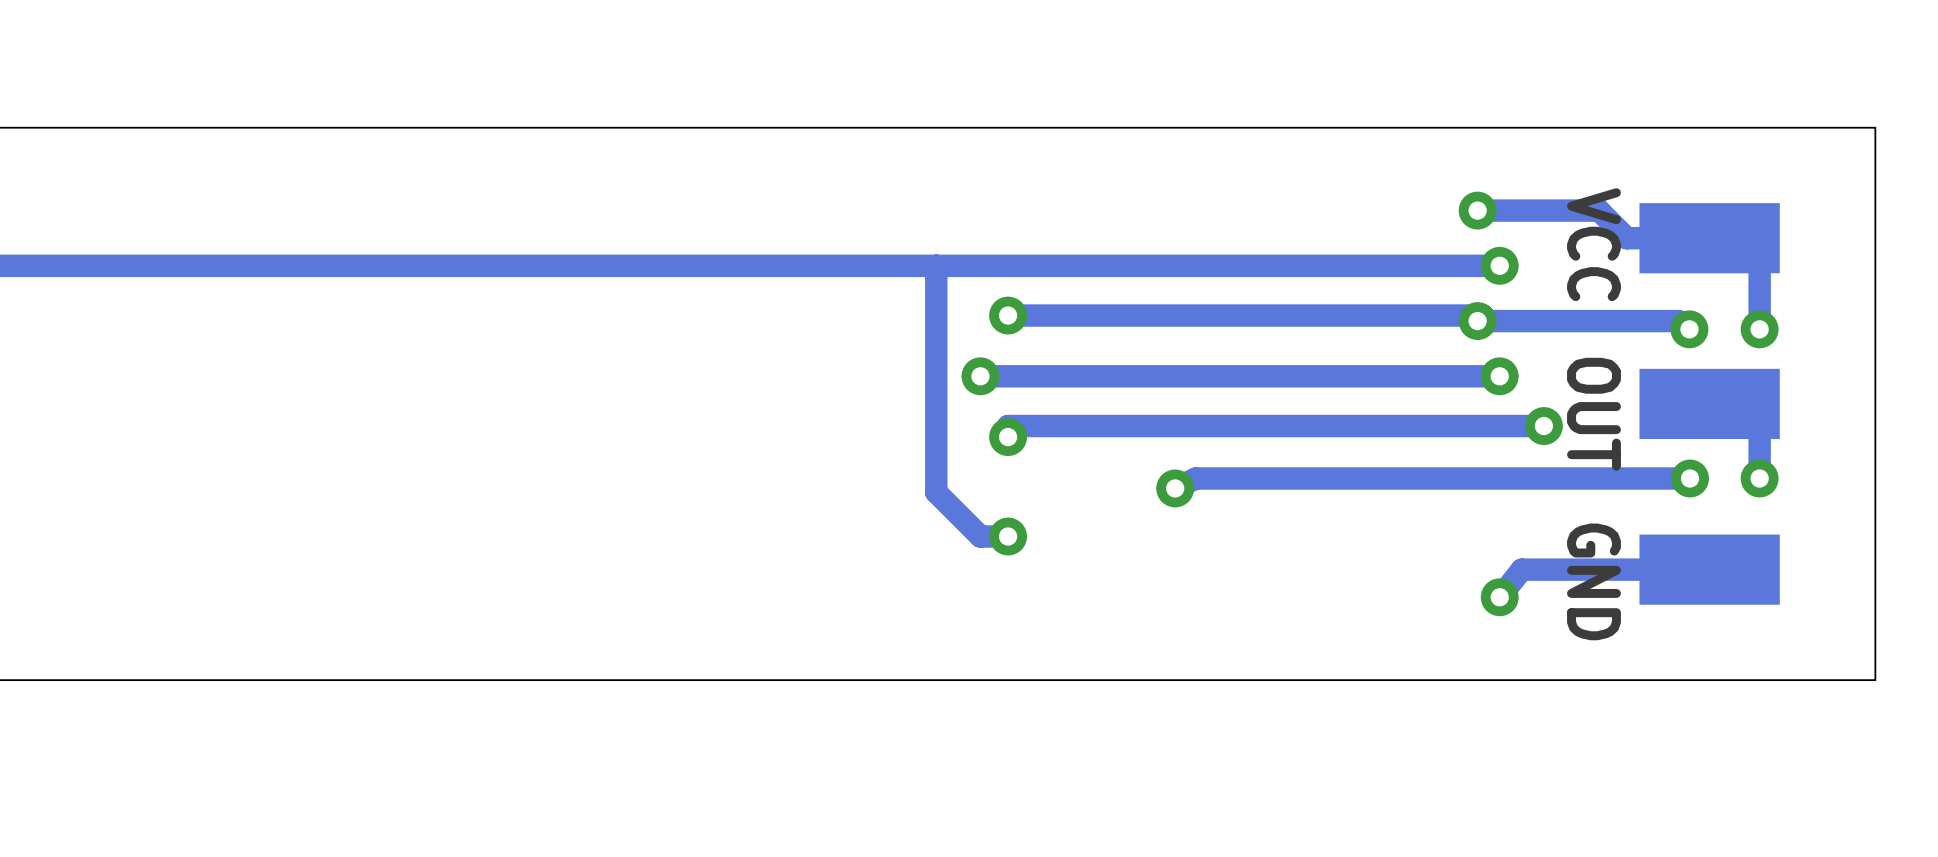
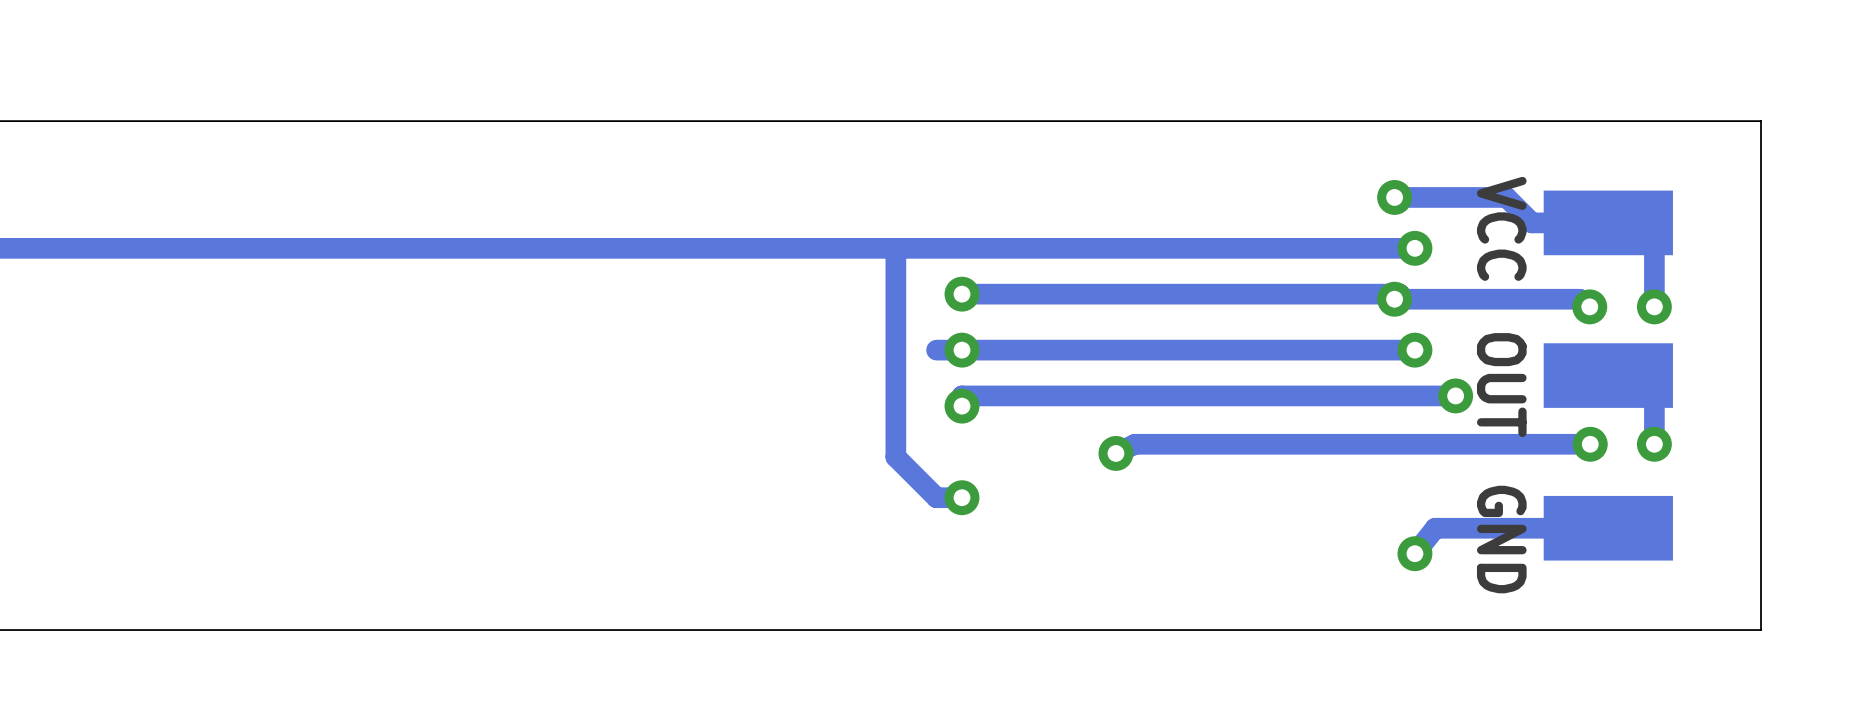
via position: (980, 376) -> (962, 350)

